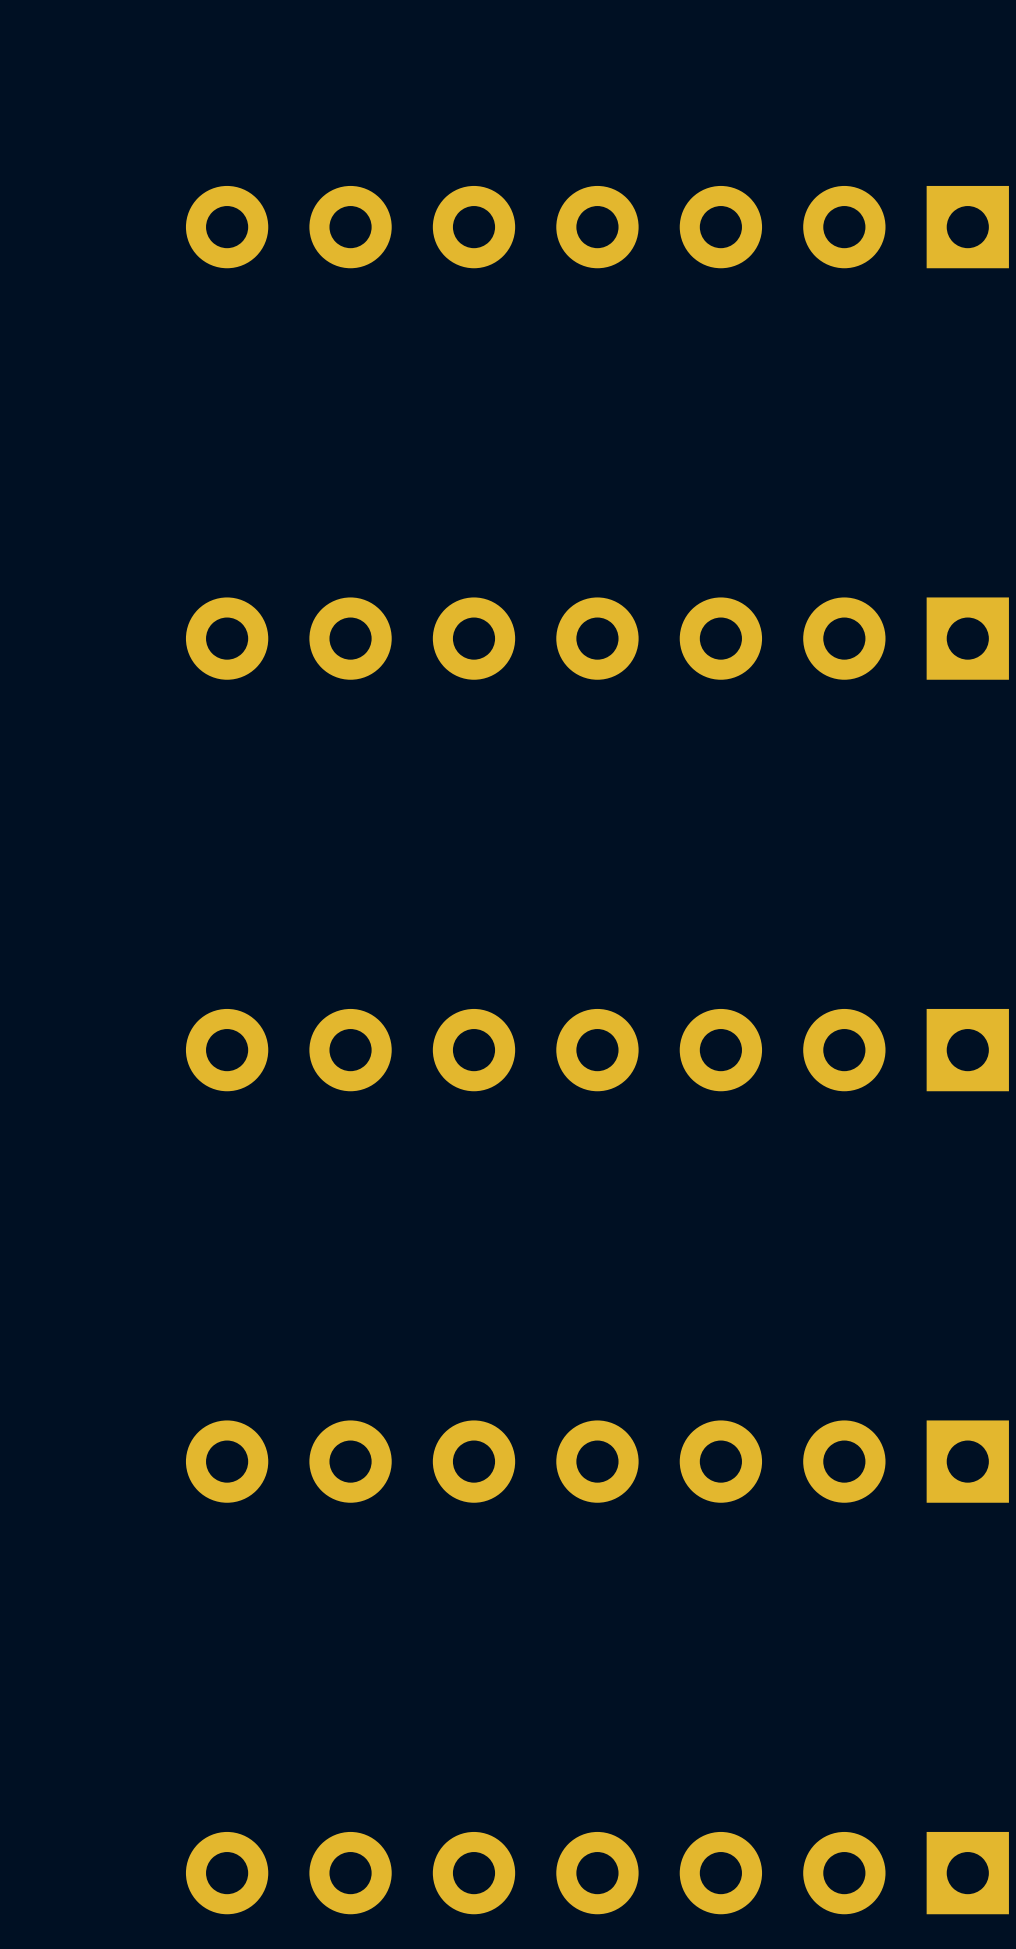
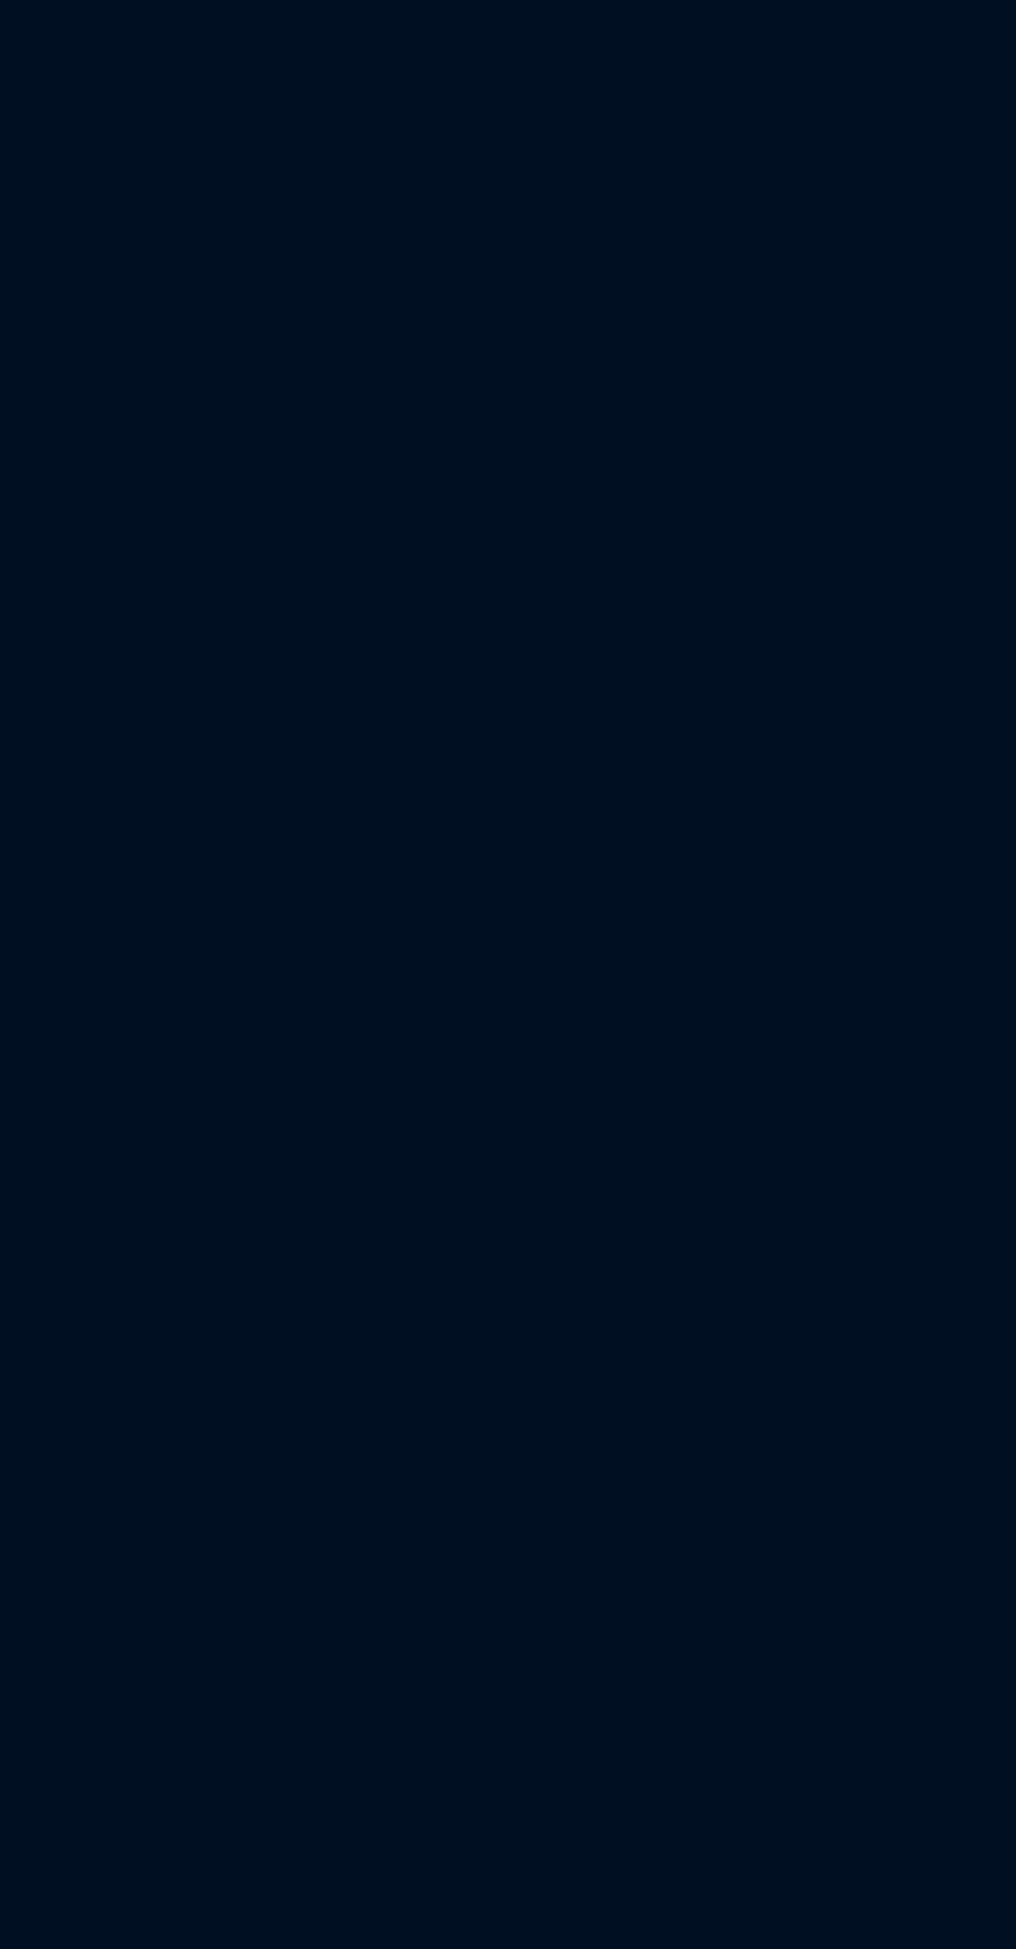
part: (597, 227) -> none
part: (597, 638) -> none
part: (597, 1050) -> none
part: (597, 1461) -> none
part: (597, 1873) -> none

